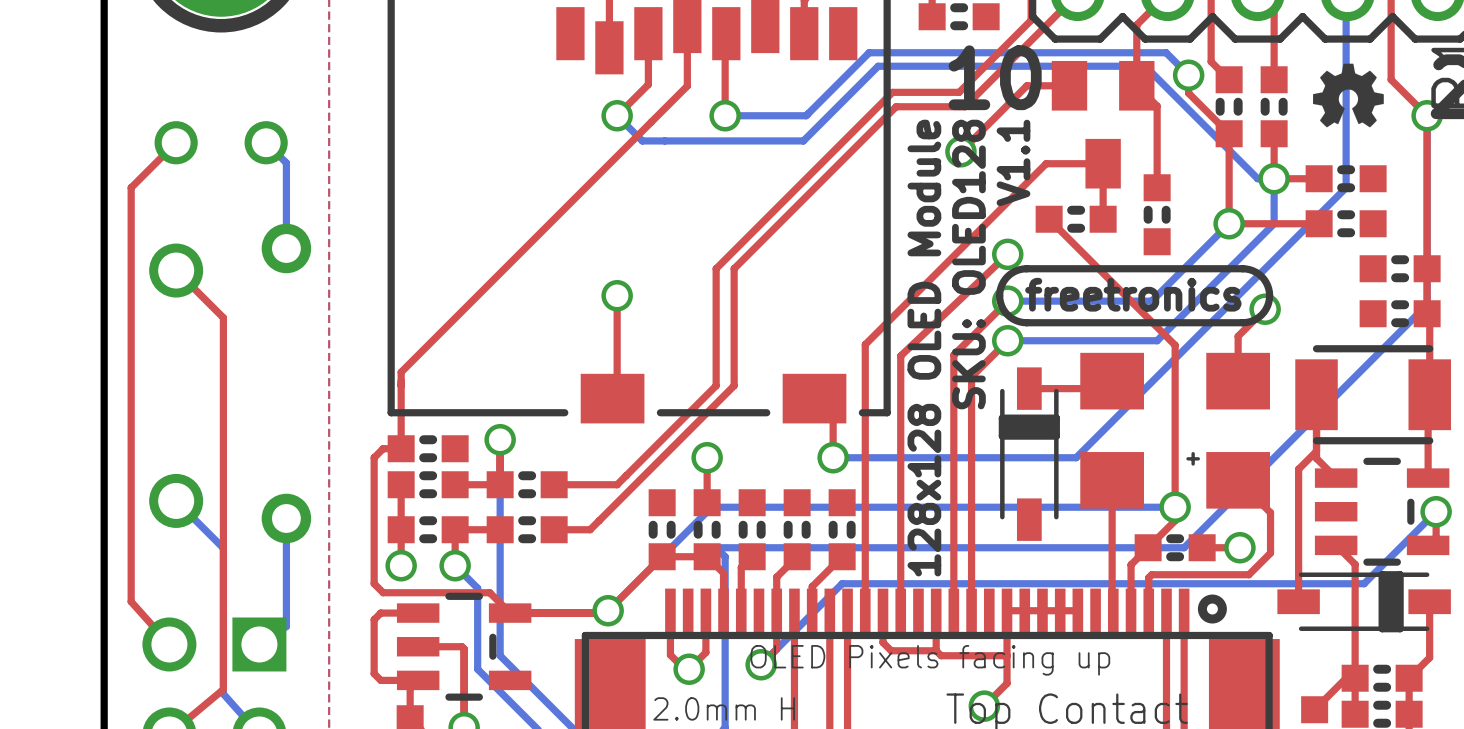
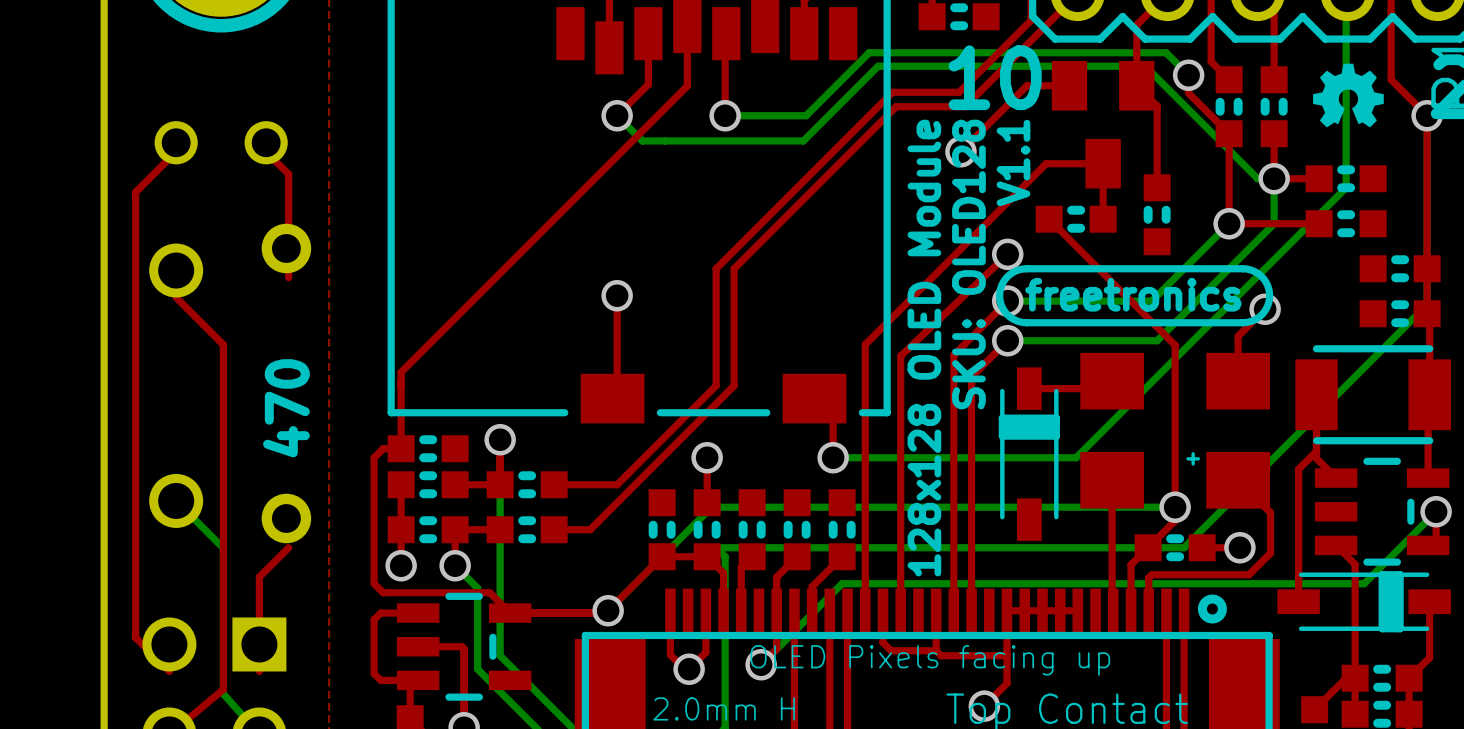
top track: (176, 142) (131, 187) (131, 601) (169, 644) -> none
bottom track: (266, 142) (286, 162) (286, 248) -> none
top track: none -> (176, 151) (135, 192) (135, 637) (169, 671)
top track: none -> (266, 151) (288, 174) (288, 277)
top track: (176, 270) (223, 317) (223, 344) -> (176, 297) (223, 344)
text: none -> 470 (286, 408)
bottom track: (286, 518) (286, 626) (259, 644) -> none
top track: none -> (288, 547) (259, 576) (259, 671)

